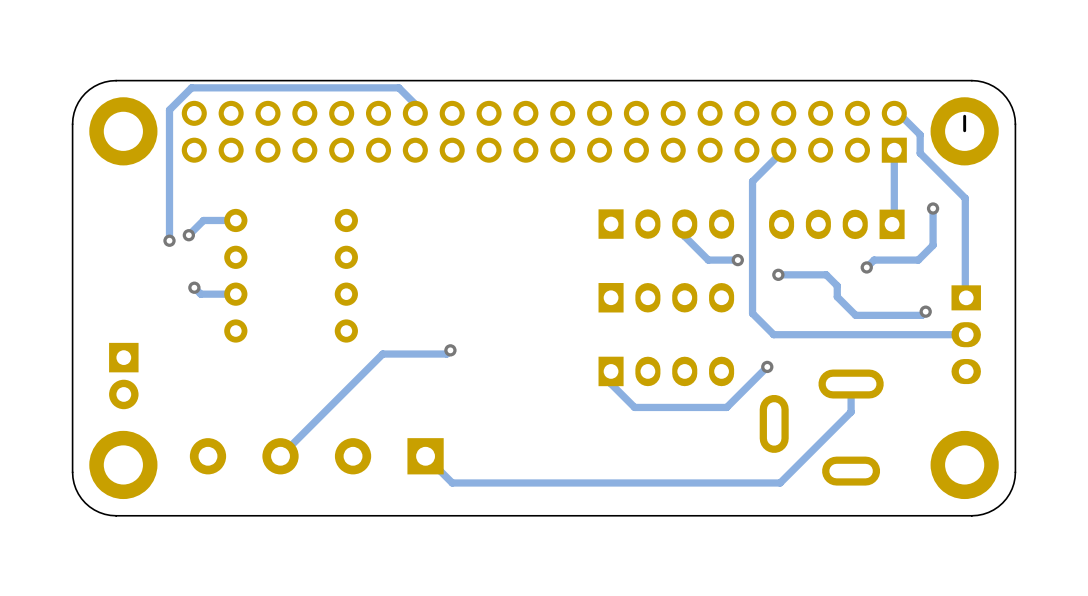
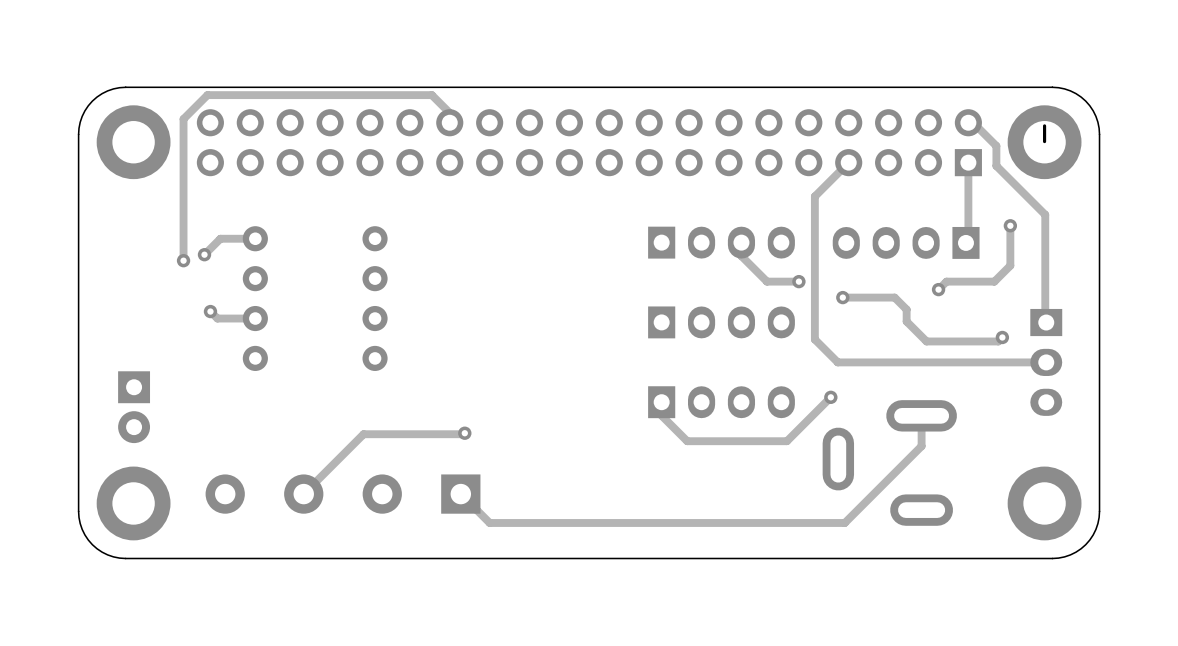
track: (450, 350) (446, 354) (382, 354) (335, 401) -> (464, 433) (363, 434)
via position: (450, 350) -> (464, 433)

